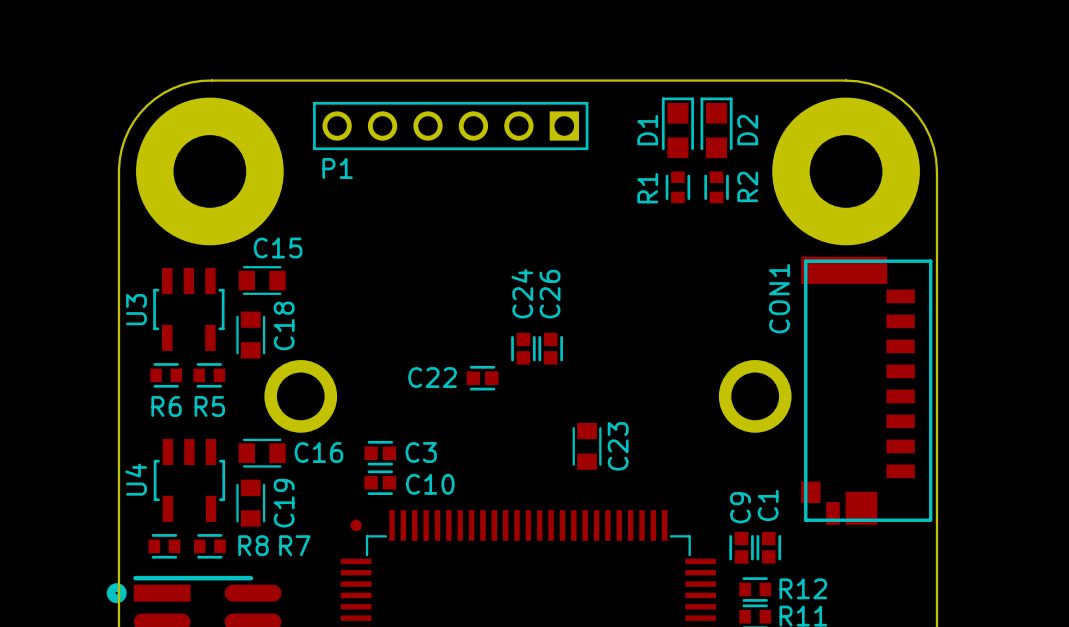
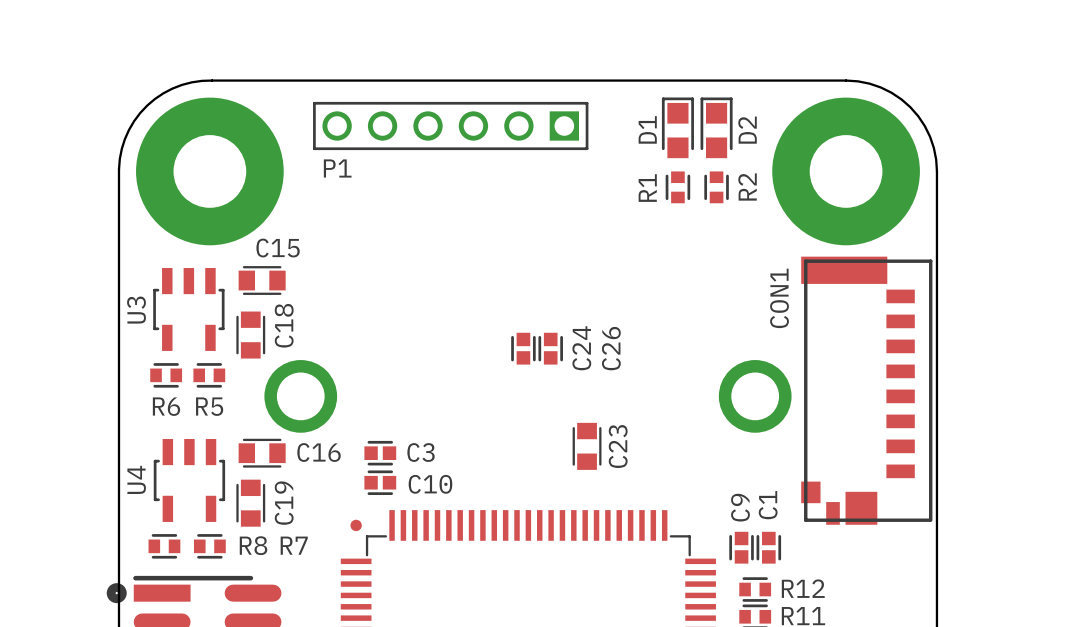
C24 name position: C24 (522, 293) -> C24 (581, 348)
C26 name position: C26 (550, 294) -> C26 (611, 348)
C22: (482, 378) -> none

